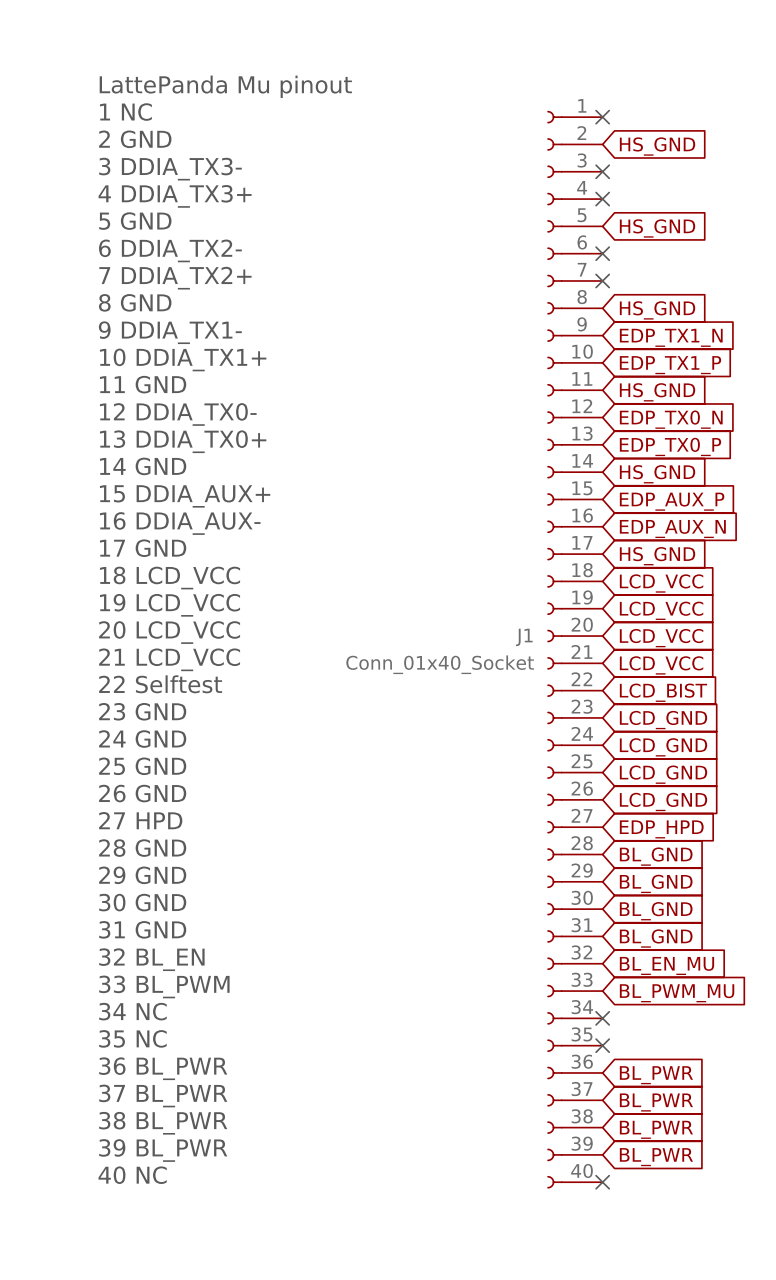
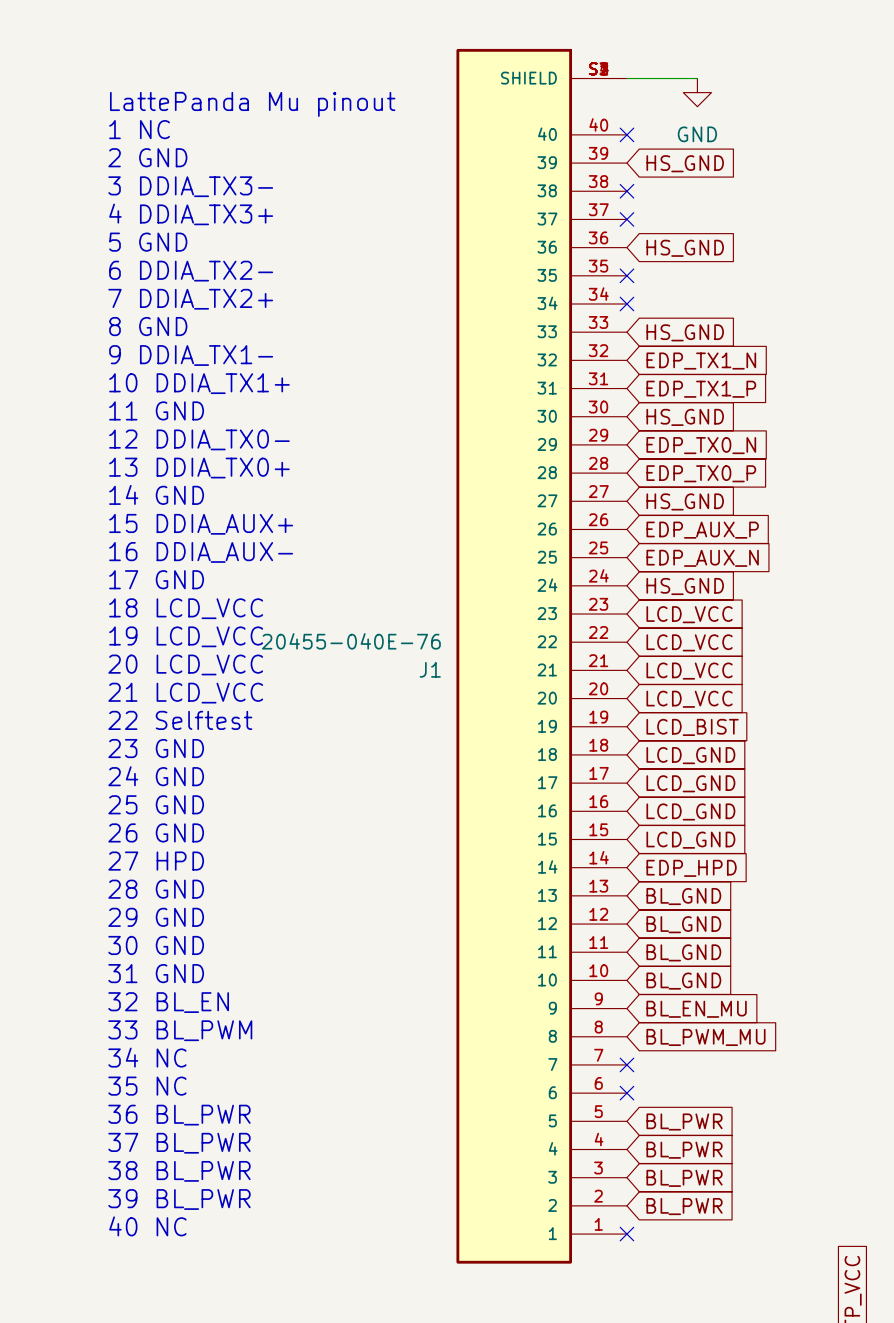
wire: none -> (626, 78) (697, 78)
power symbol: none -> GND (697, 92)
J1 symbol: [547, 110, 603, 1189] -> [456, 48, 627, 1264]
J1 name position: J1 (524, 637) -> J1 (430, 669)
J1 value: Conn_01x40_Socket (440, 664) -> 20455-040E-76 (351, 641)

